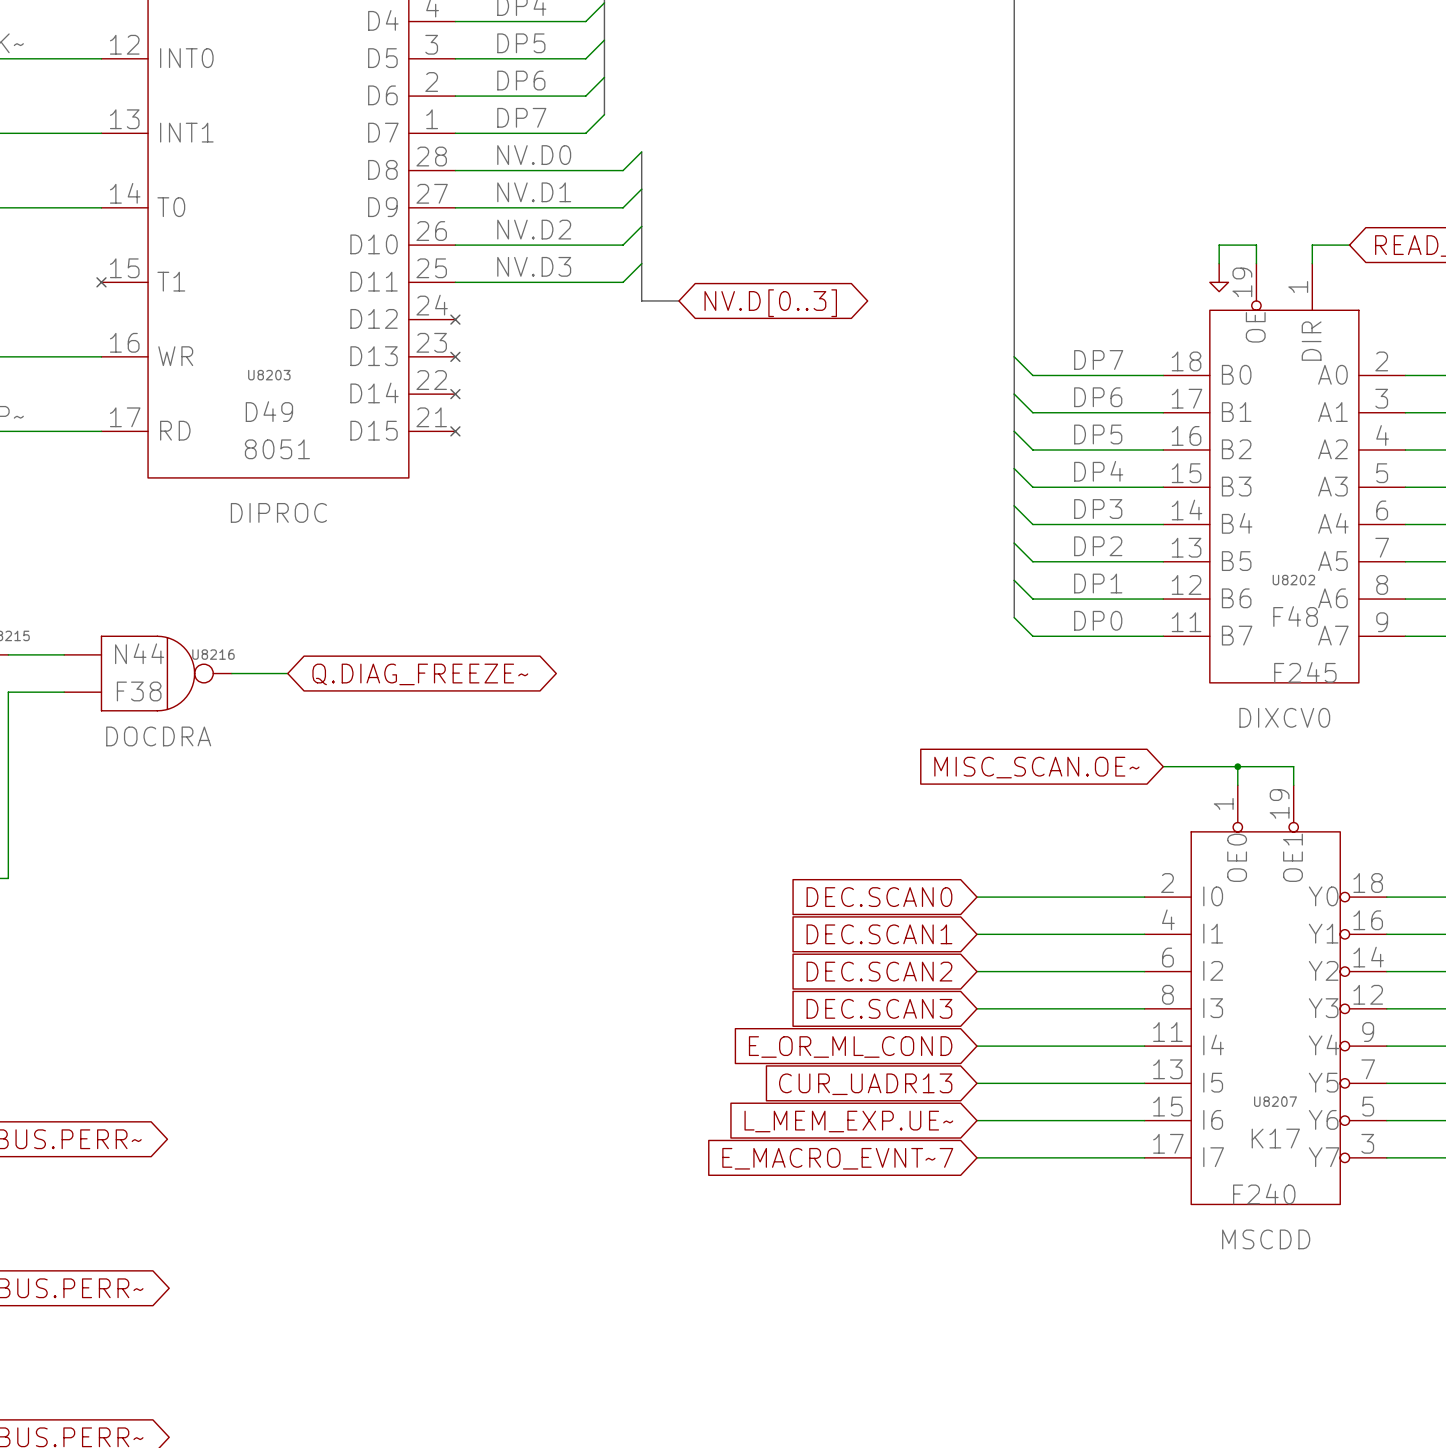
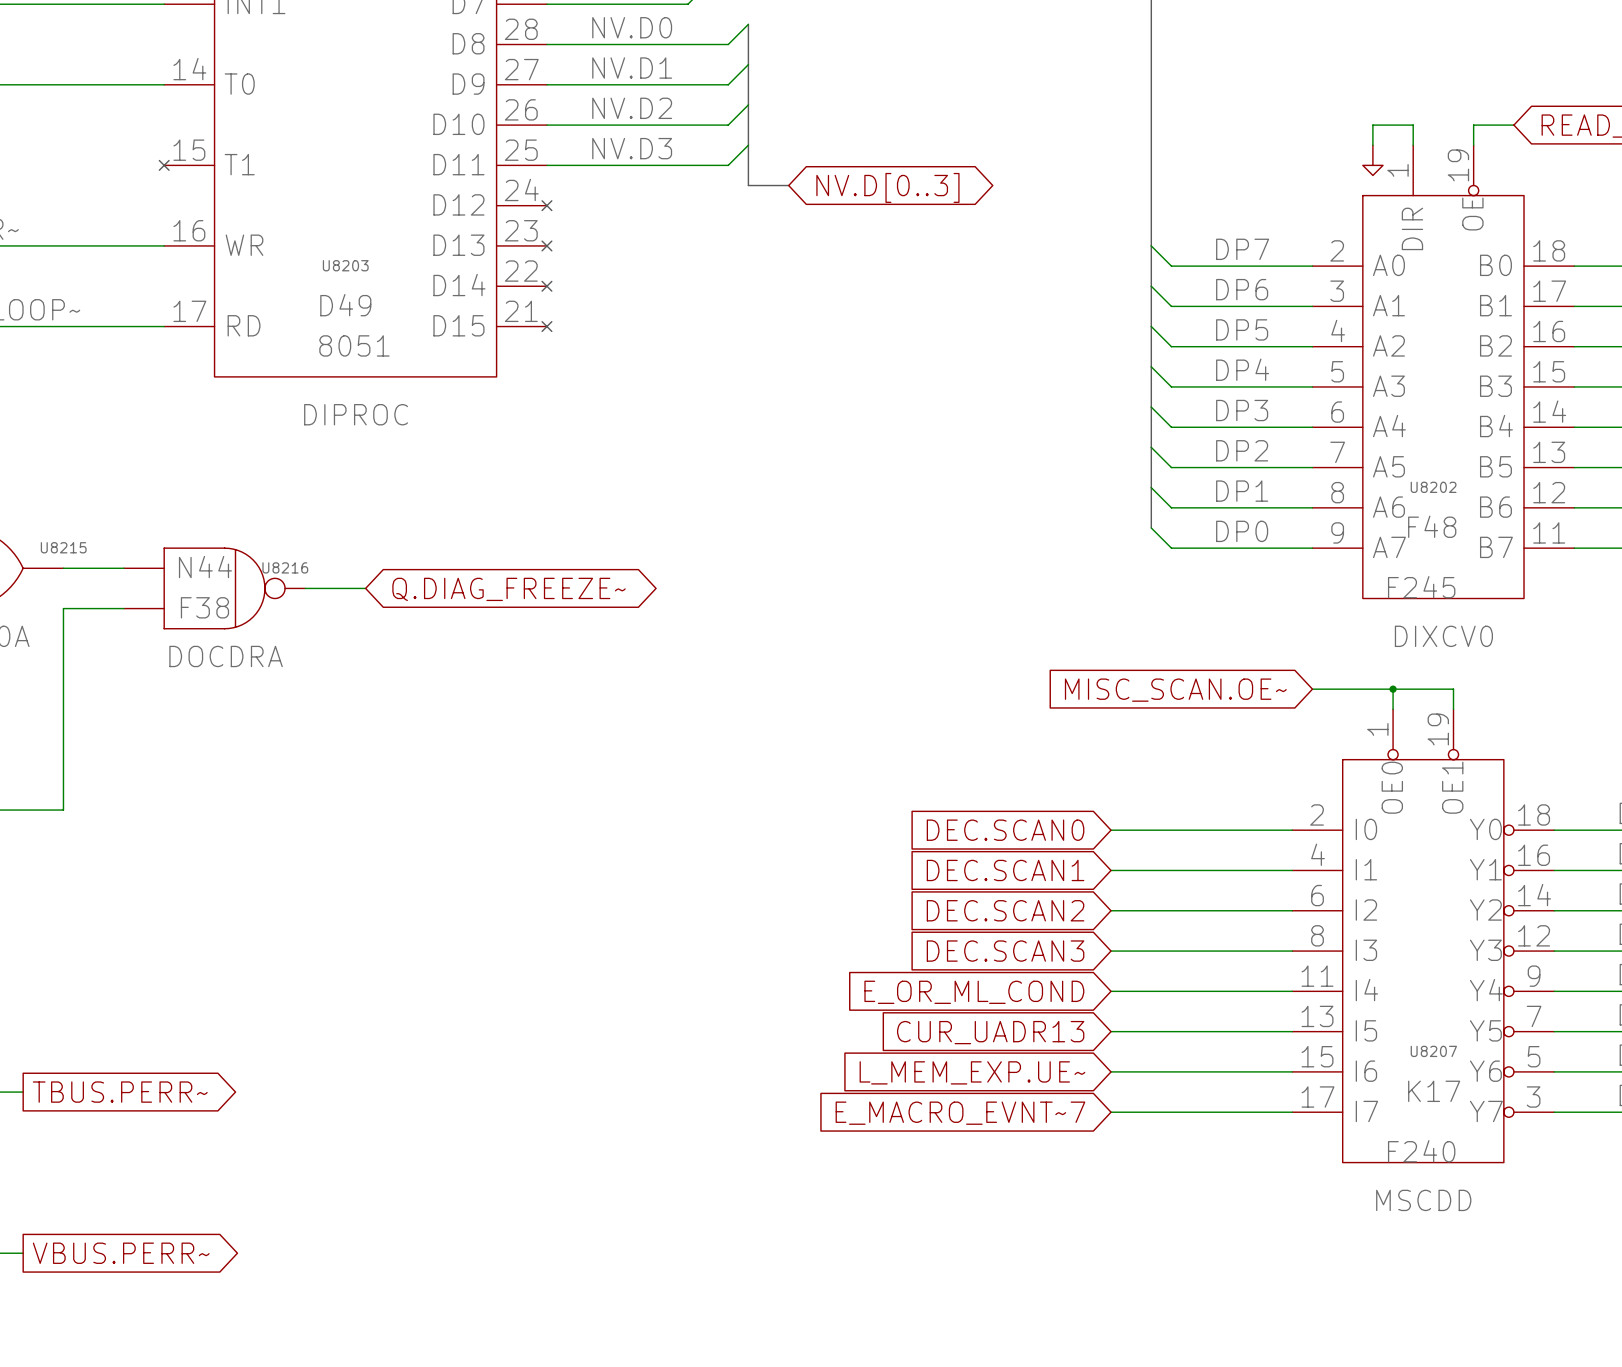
U8202 flip: as is (1284, 491) -> left-right (1443, 392)

